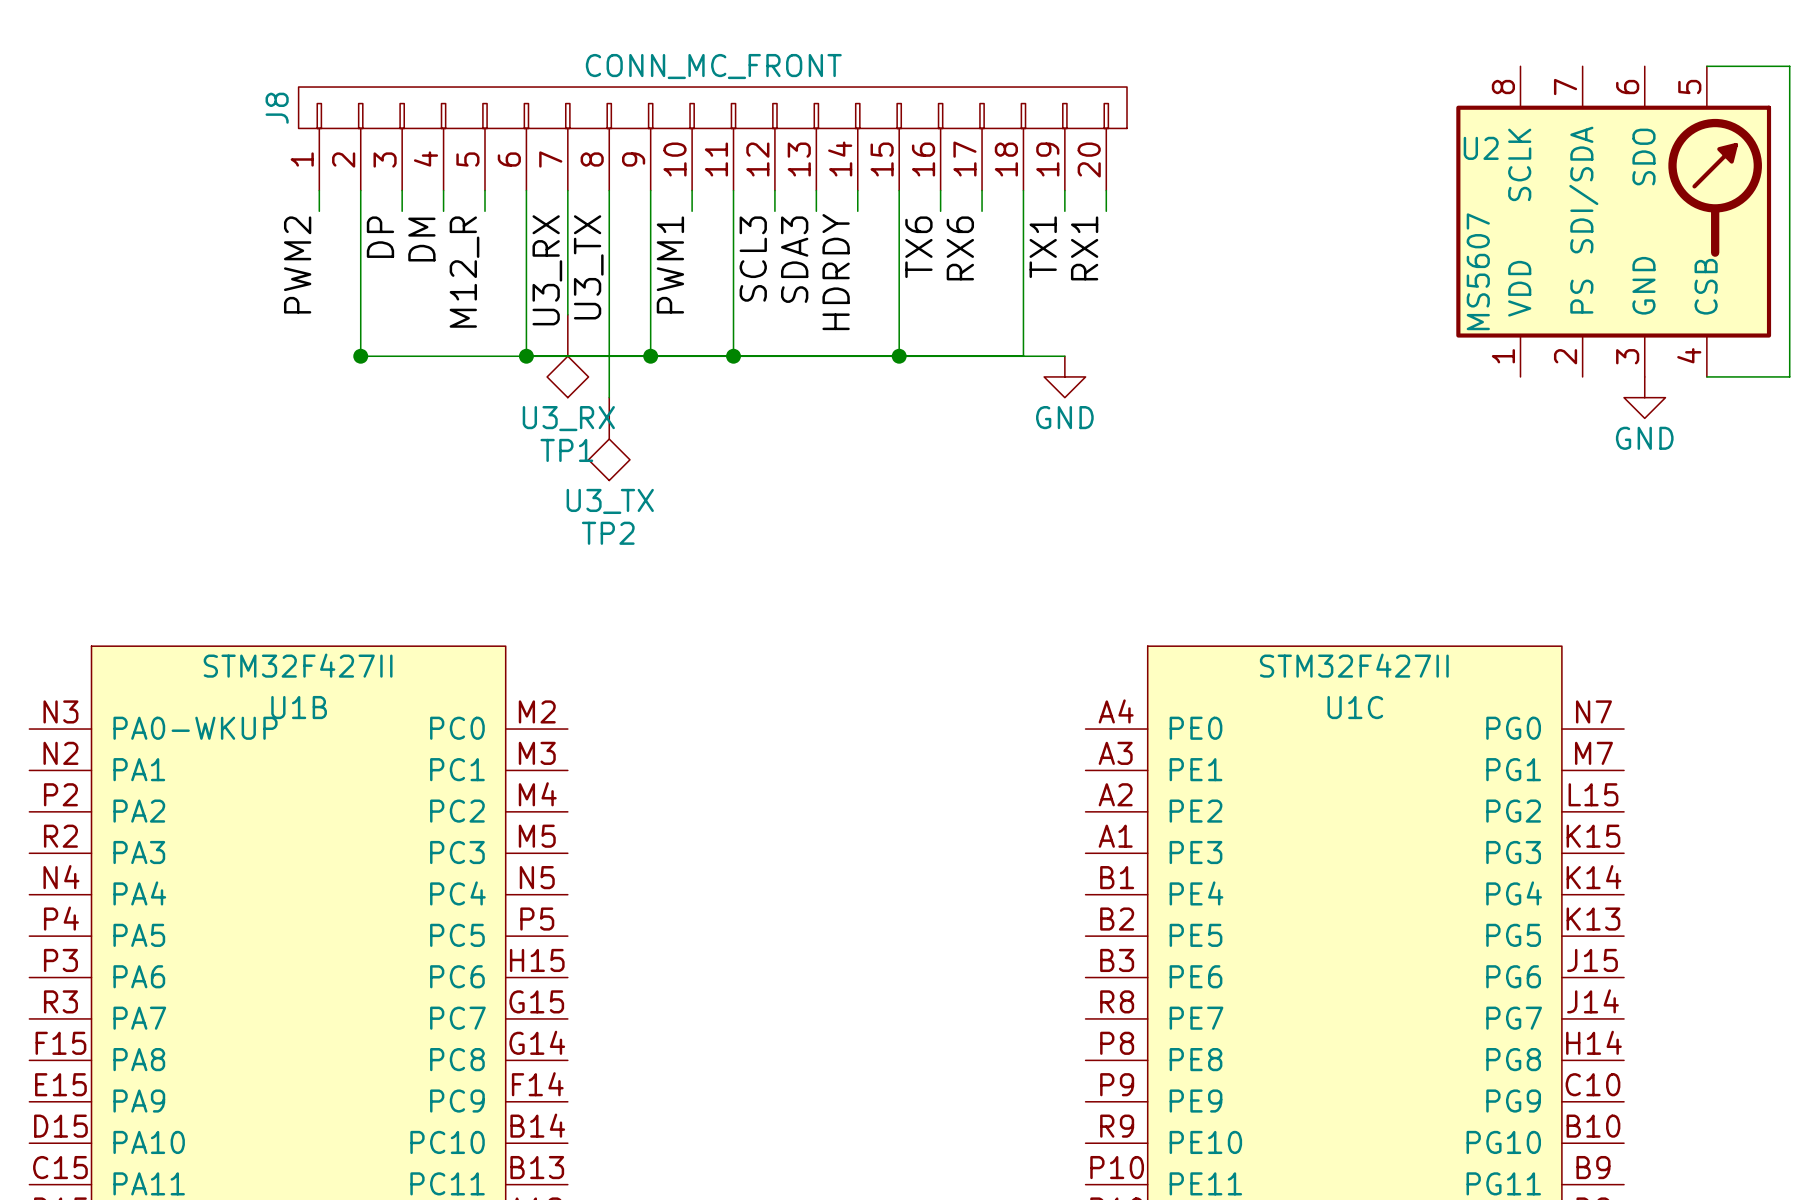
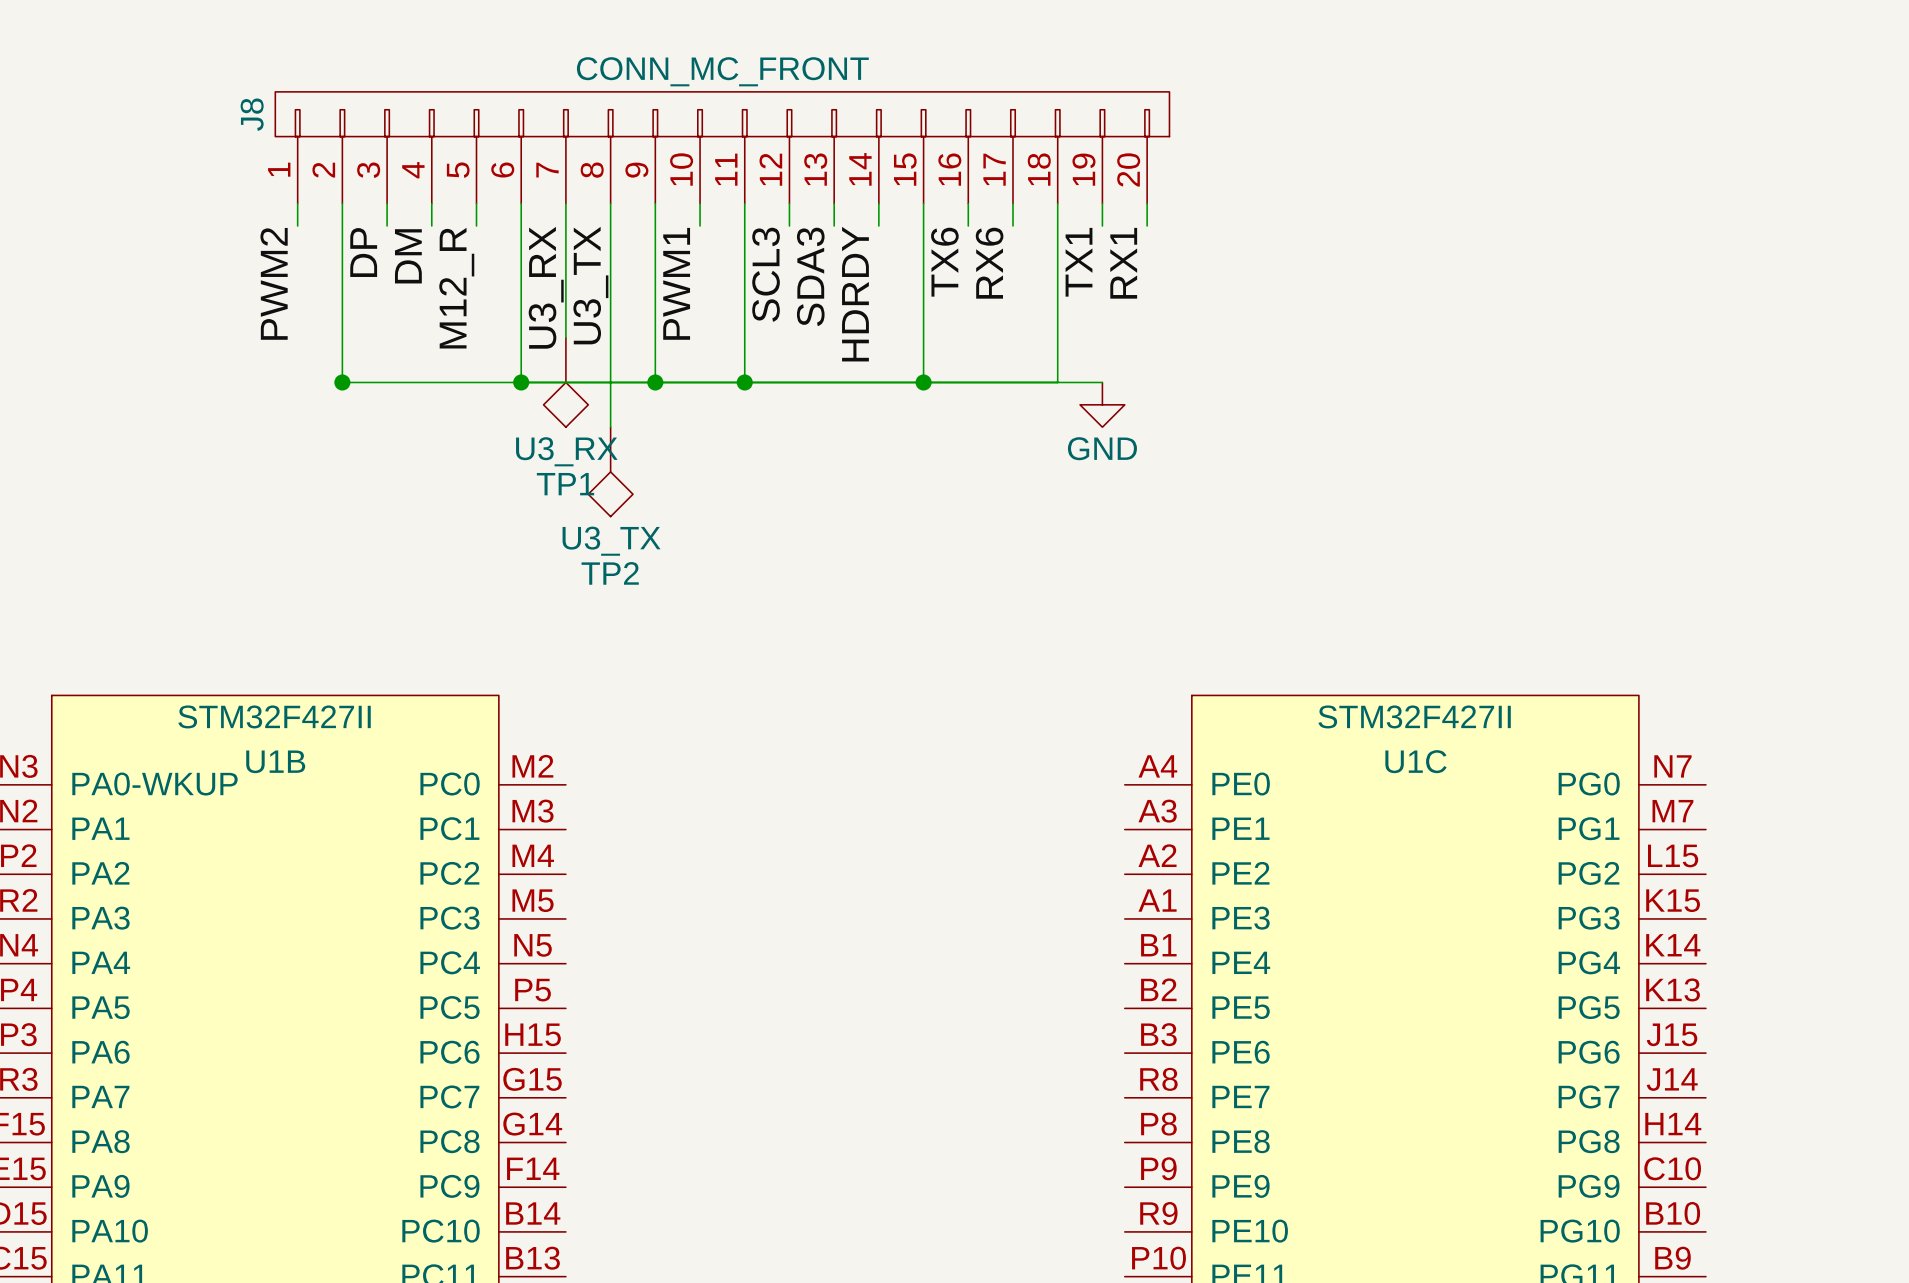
wire: (1706, 66) (1789, 66) (1789, 376) (1706, 376) -> none
U2: MS5607 (1613, 221) -> none
power symbol: GND (1644, 397) -> none

